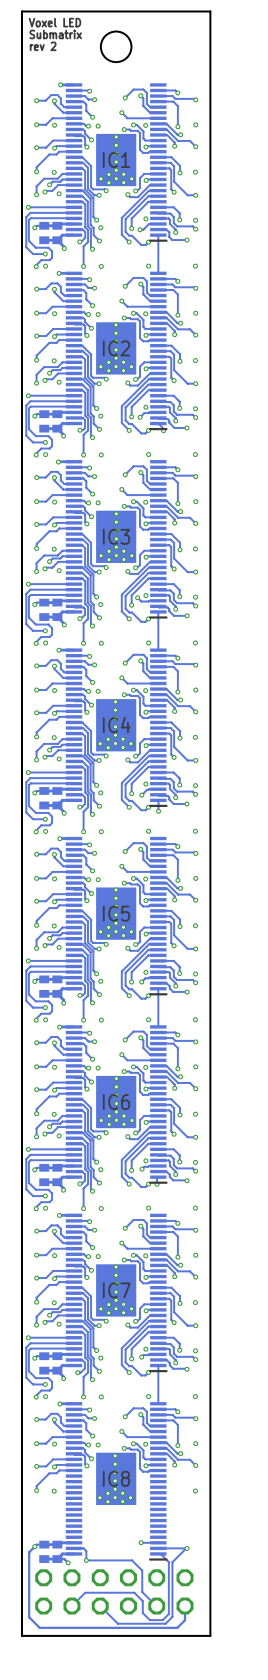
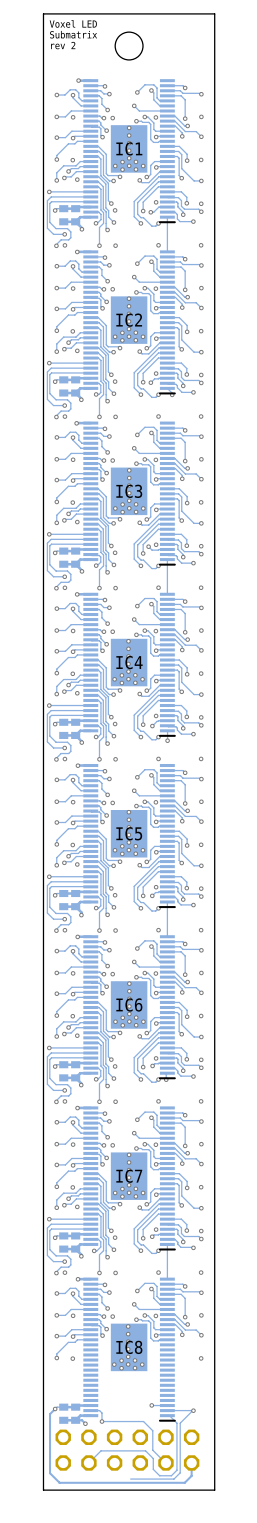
track: (100, 1606) (117, 1623) -> none

